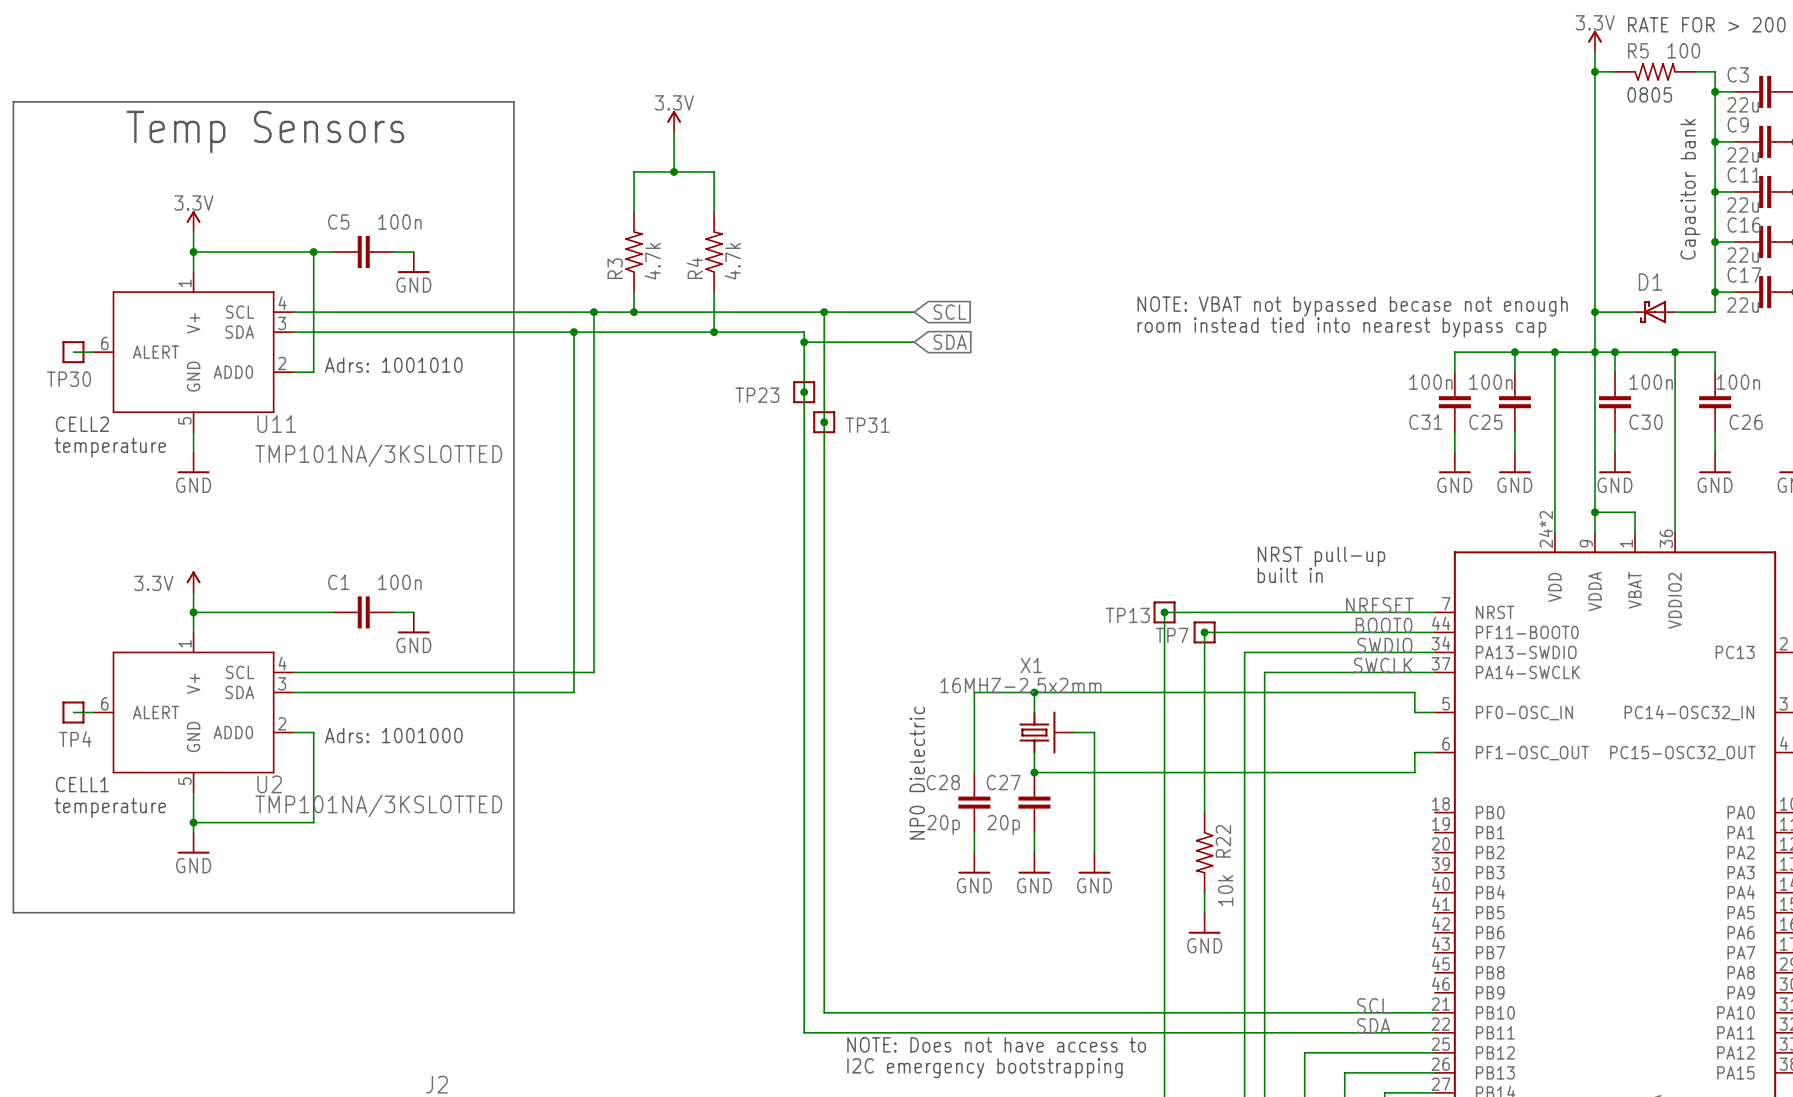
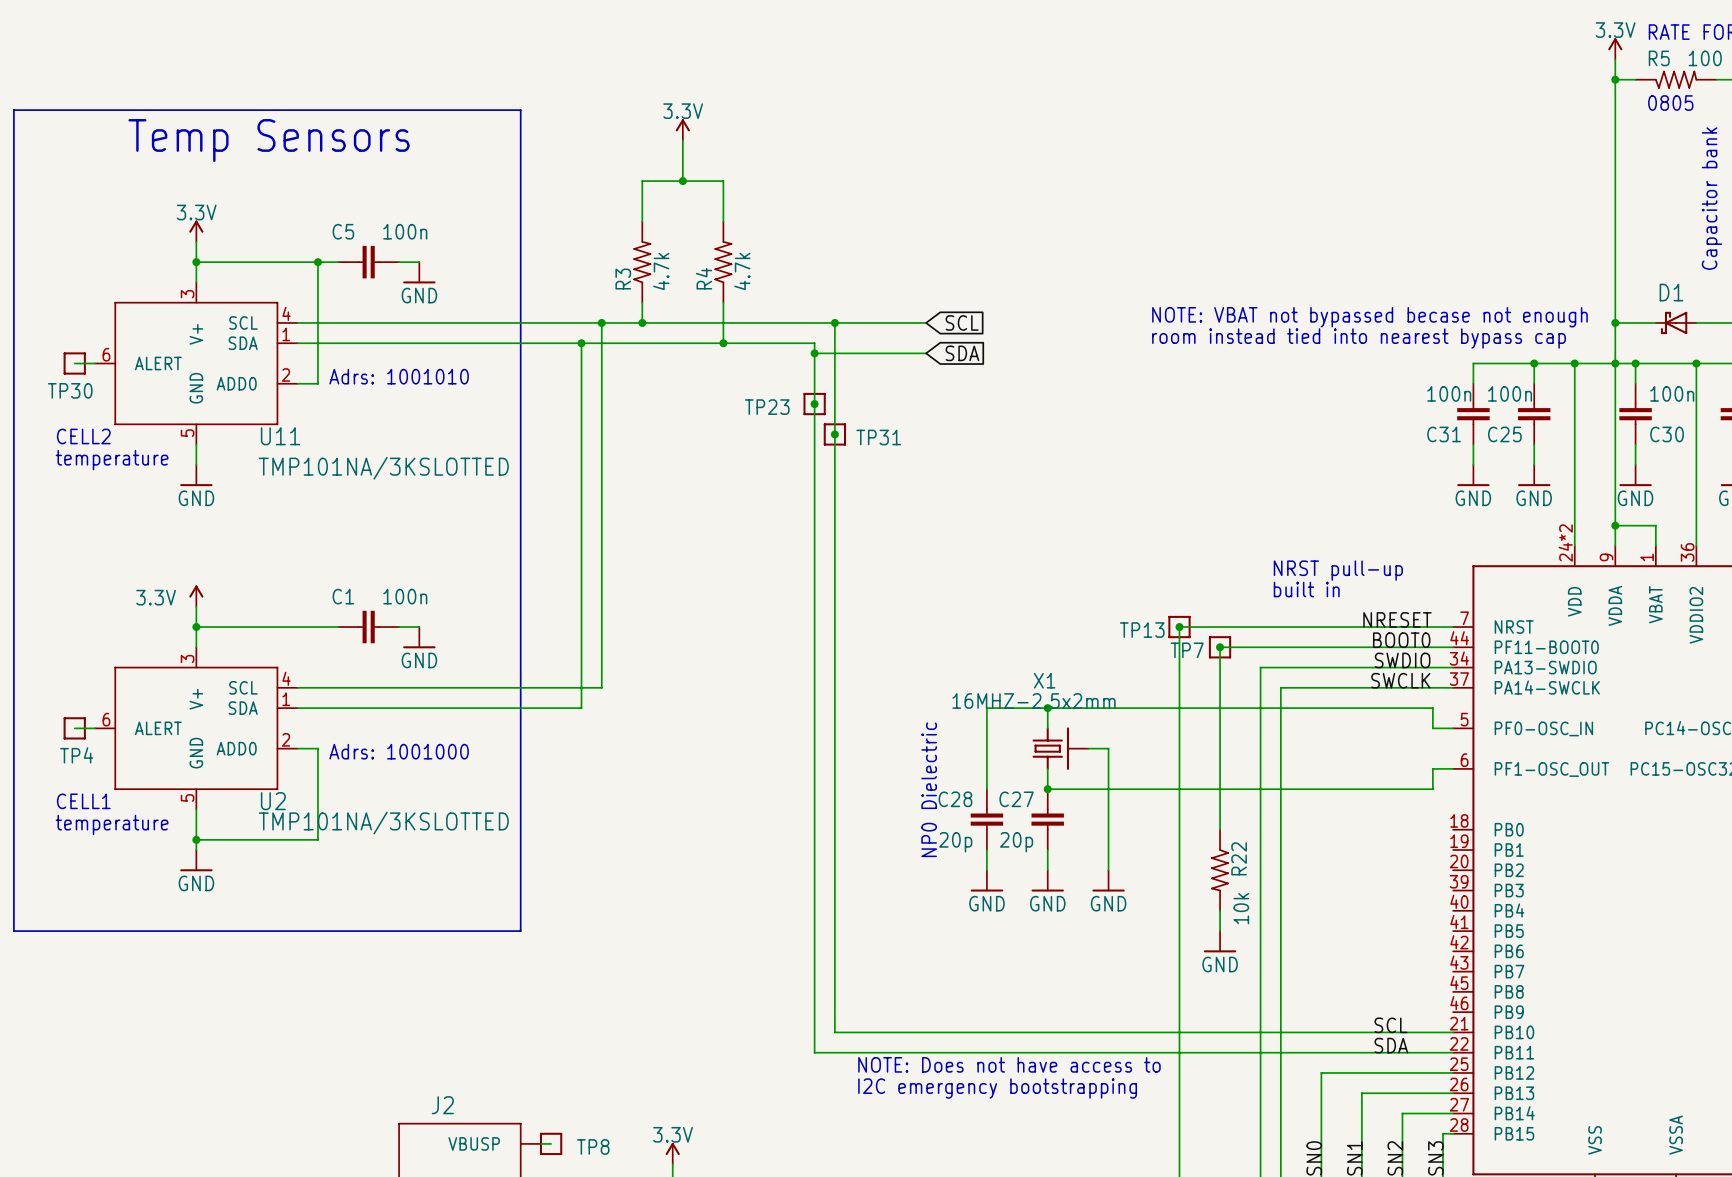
U11 pin number: 1 (184, 283) -> 3 (187, 294)
U11 pin number: 3 (282, 323) -> 1 (286, 334)
U2 pin number: 1 (184, 643) -> 3 (187, 659)
U2 pin number: 3 (282, 683) -> 1 (286, 699)

